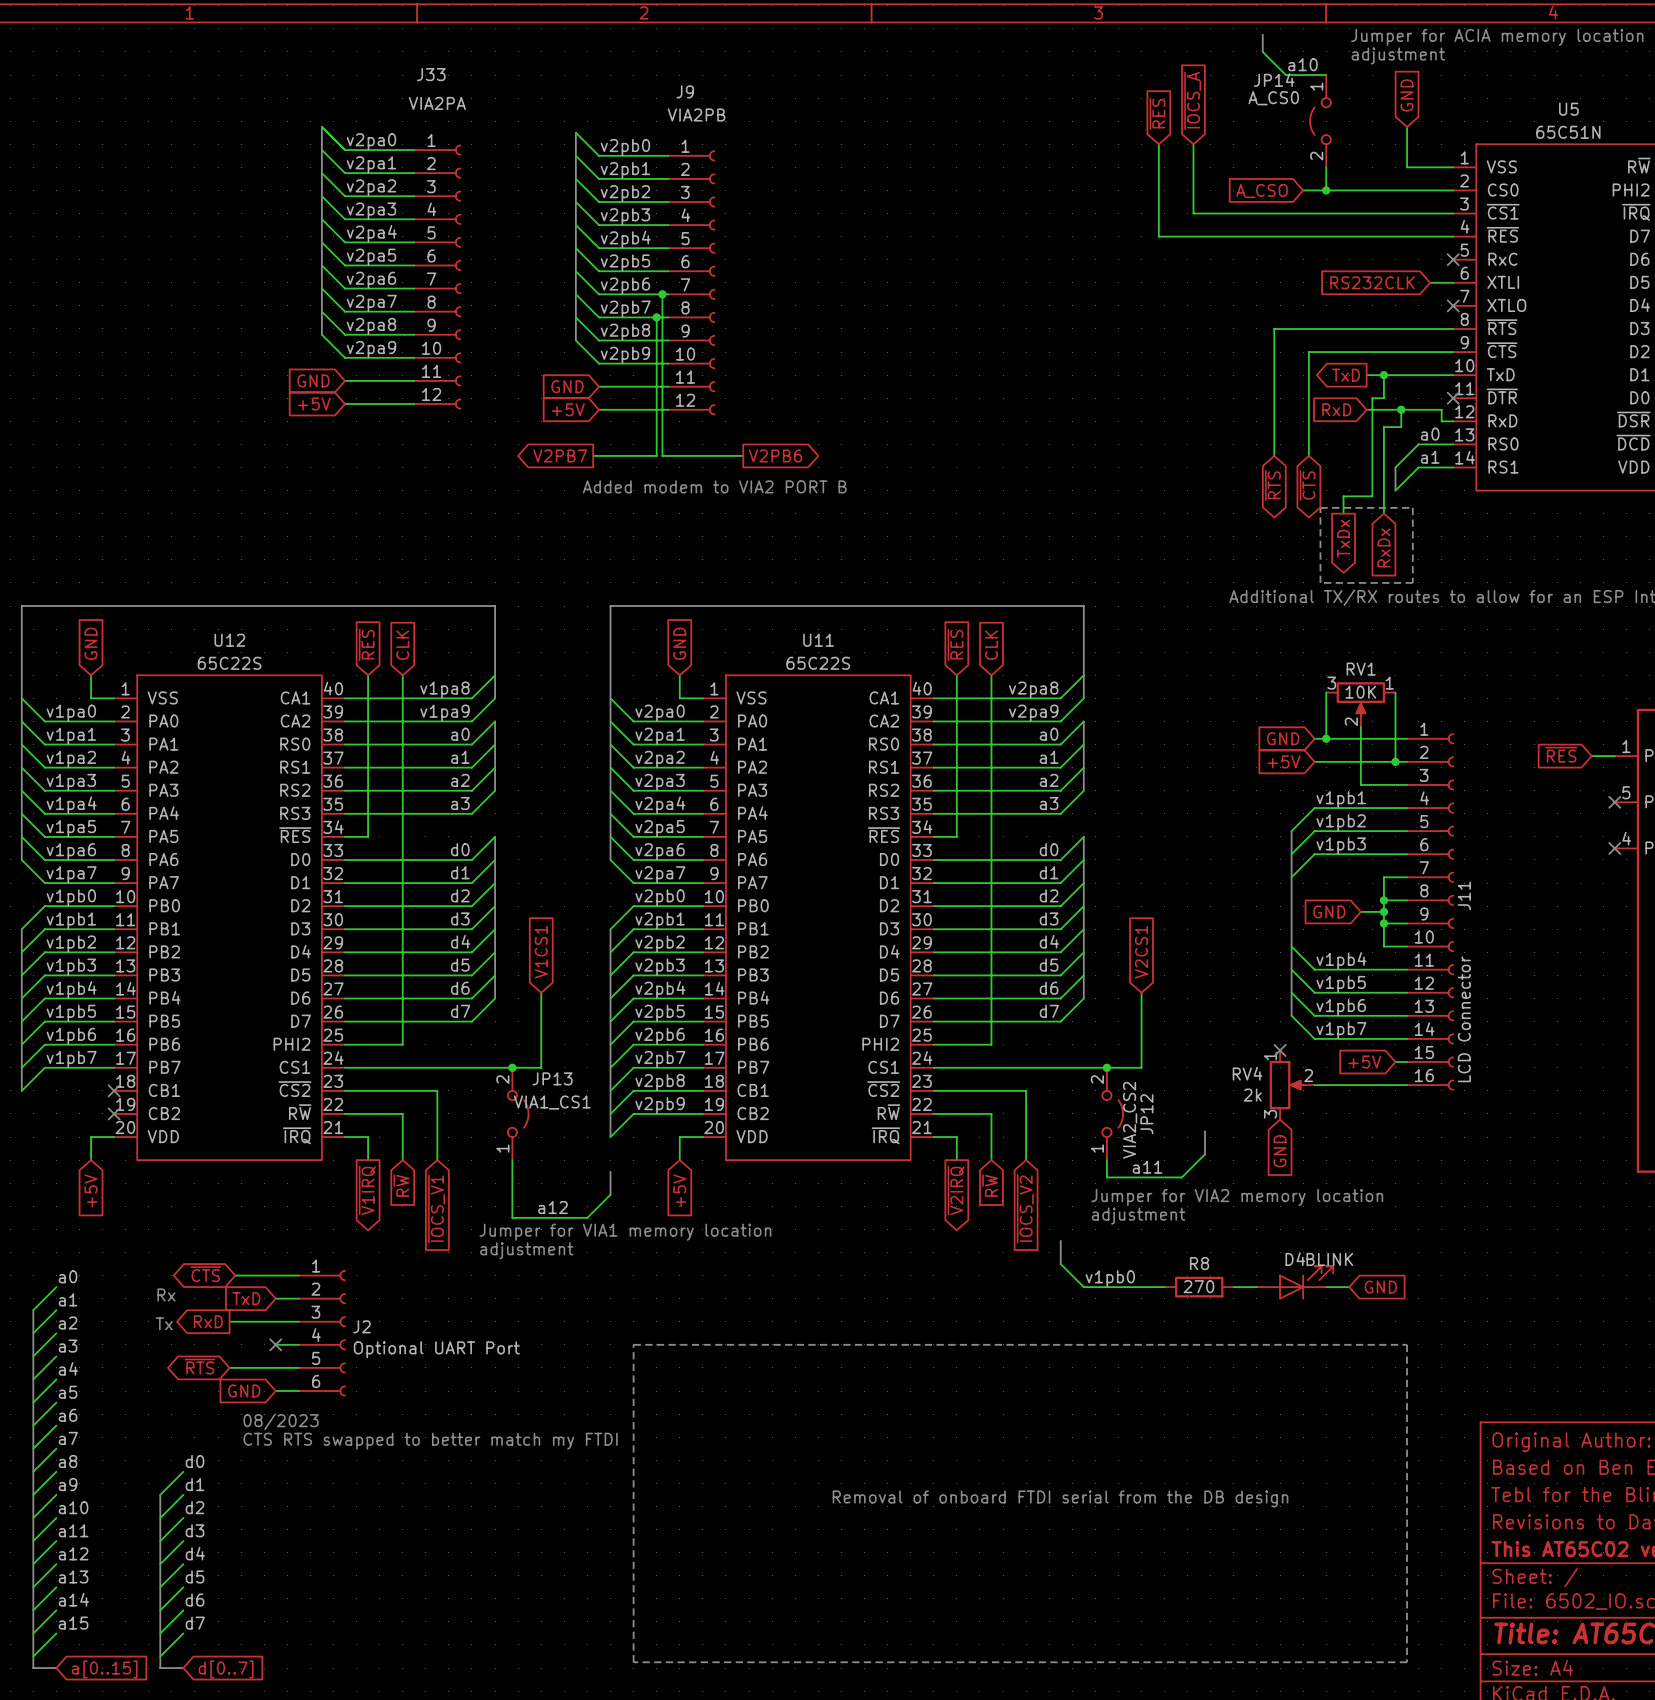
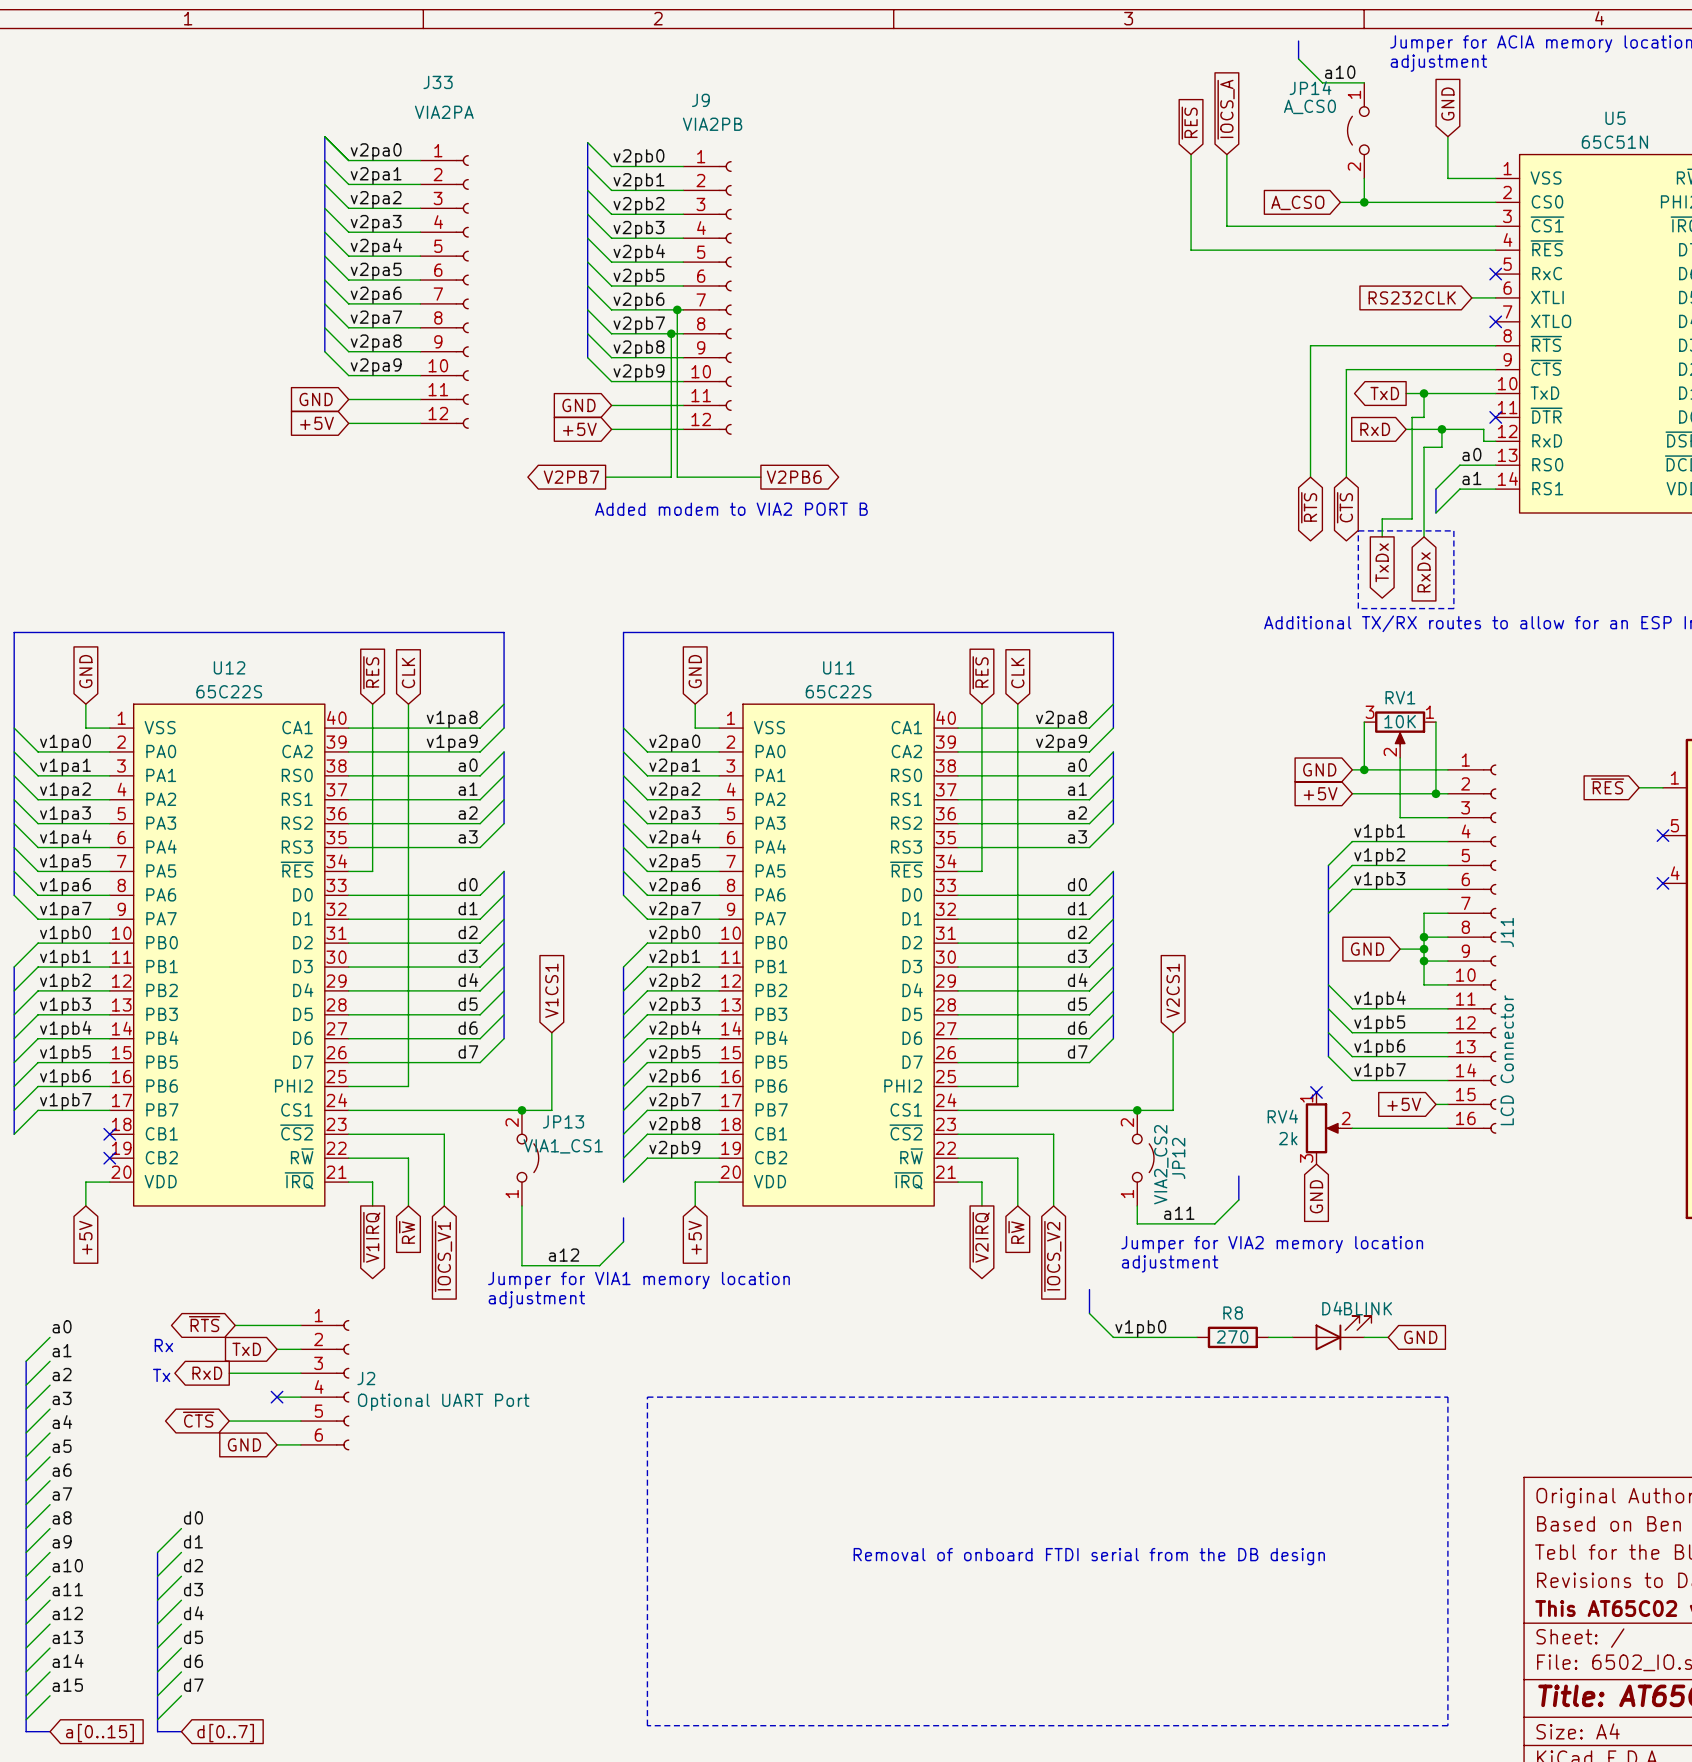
global label: ~{CTS} (205, 1274) -> ~{RTS} (204, 1324)
global label: ~{RTS} (200, 1366) -> ~{CTS} (198, 1419)
text: 08/2023 (281, 1421) -> none
text: CTS RTS swapped to better match my FTDI (430, 1441) -> none

